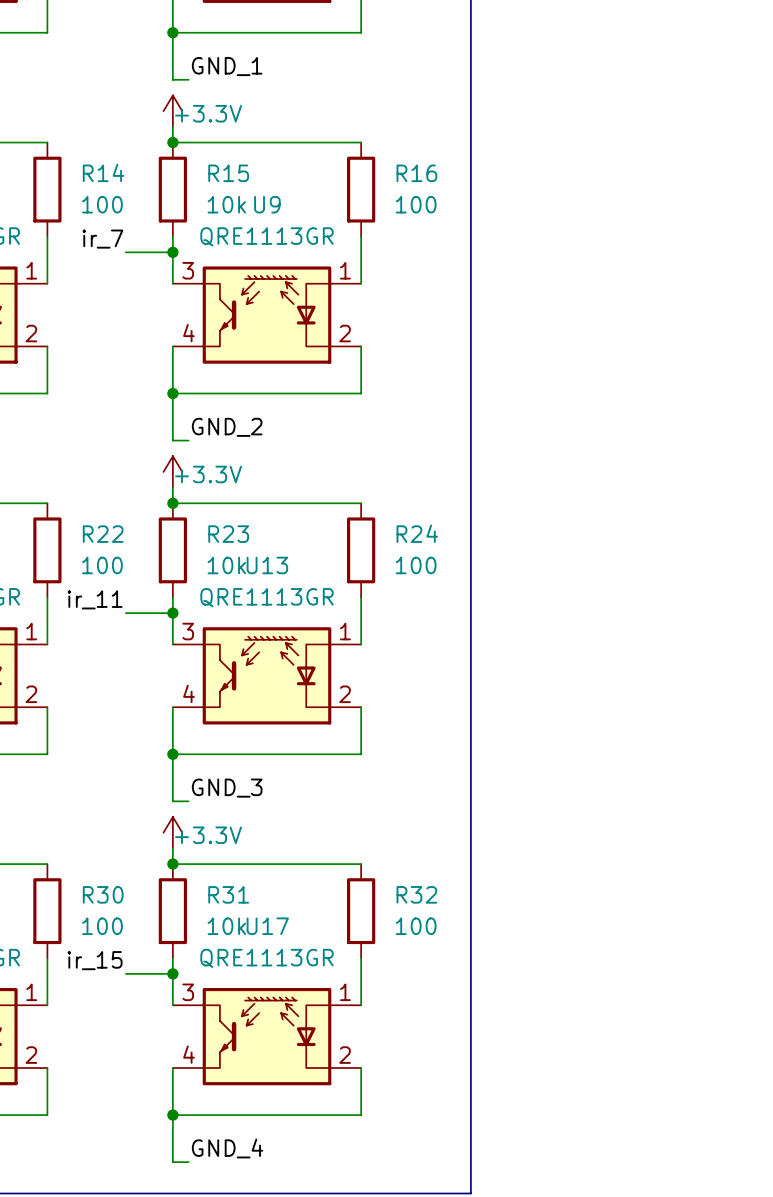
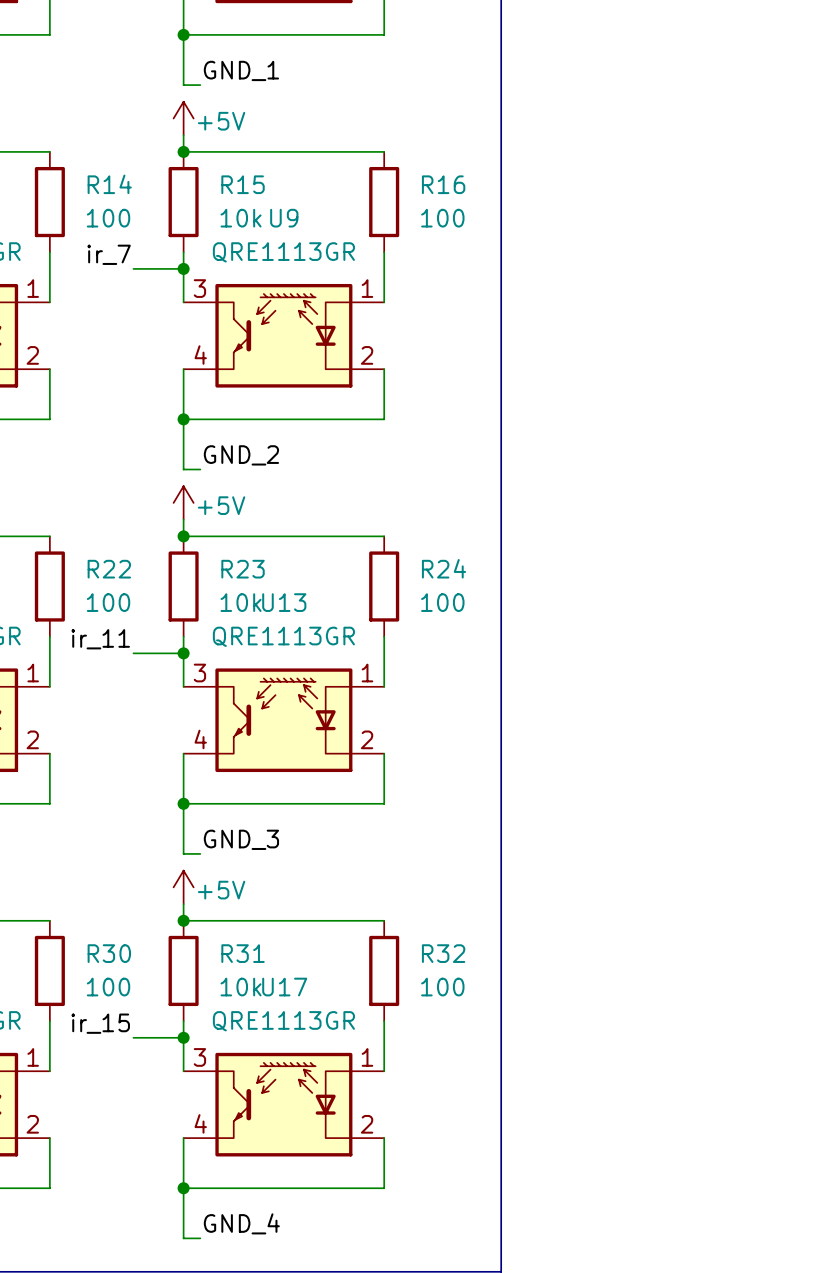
power symbol: +3.3V (172, 111) -> +5V (183, 118)
power symbol: +3.3V (172, 471) -> +5V (183, 502)
power symbol: +3.3V (172, 832) -> +5V (183, 887)

